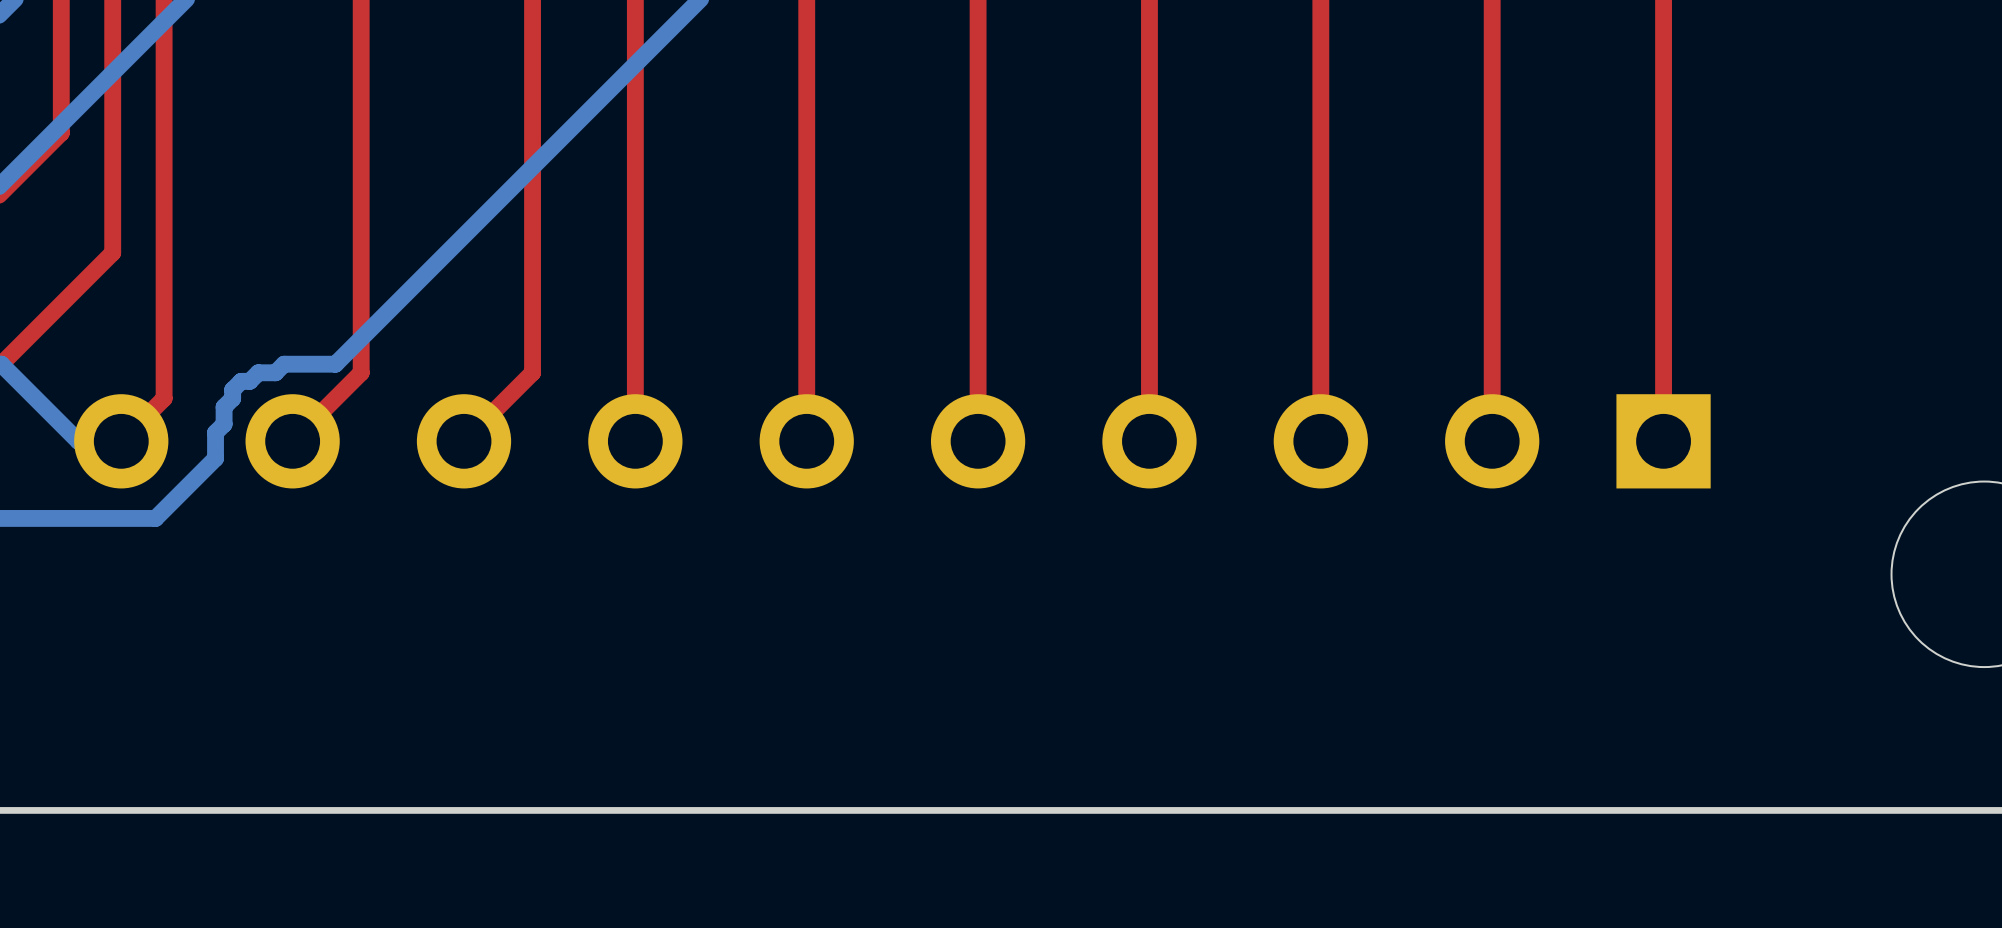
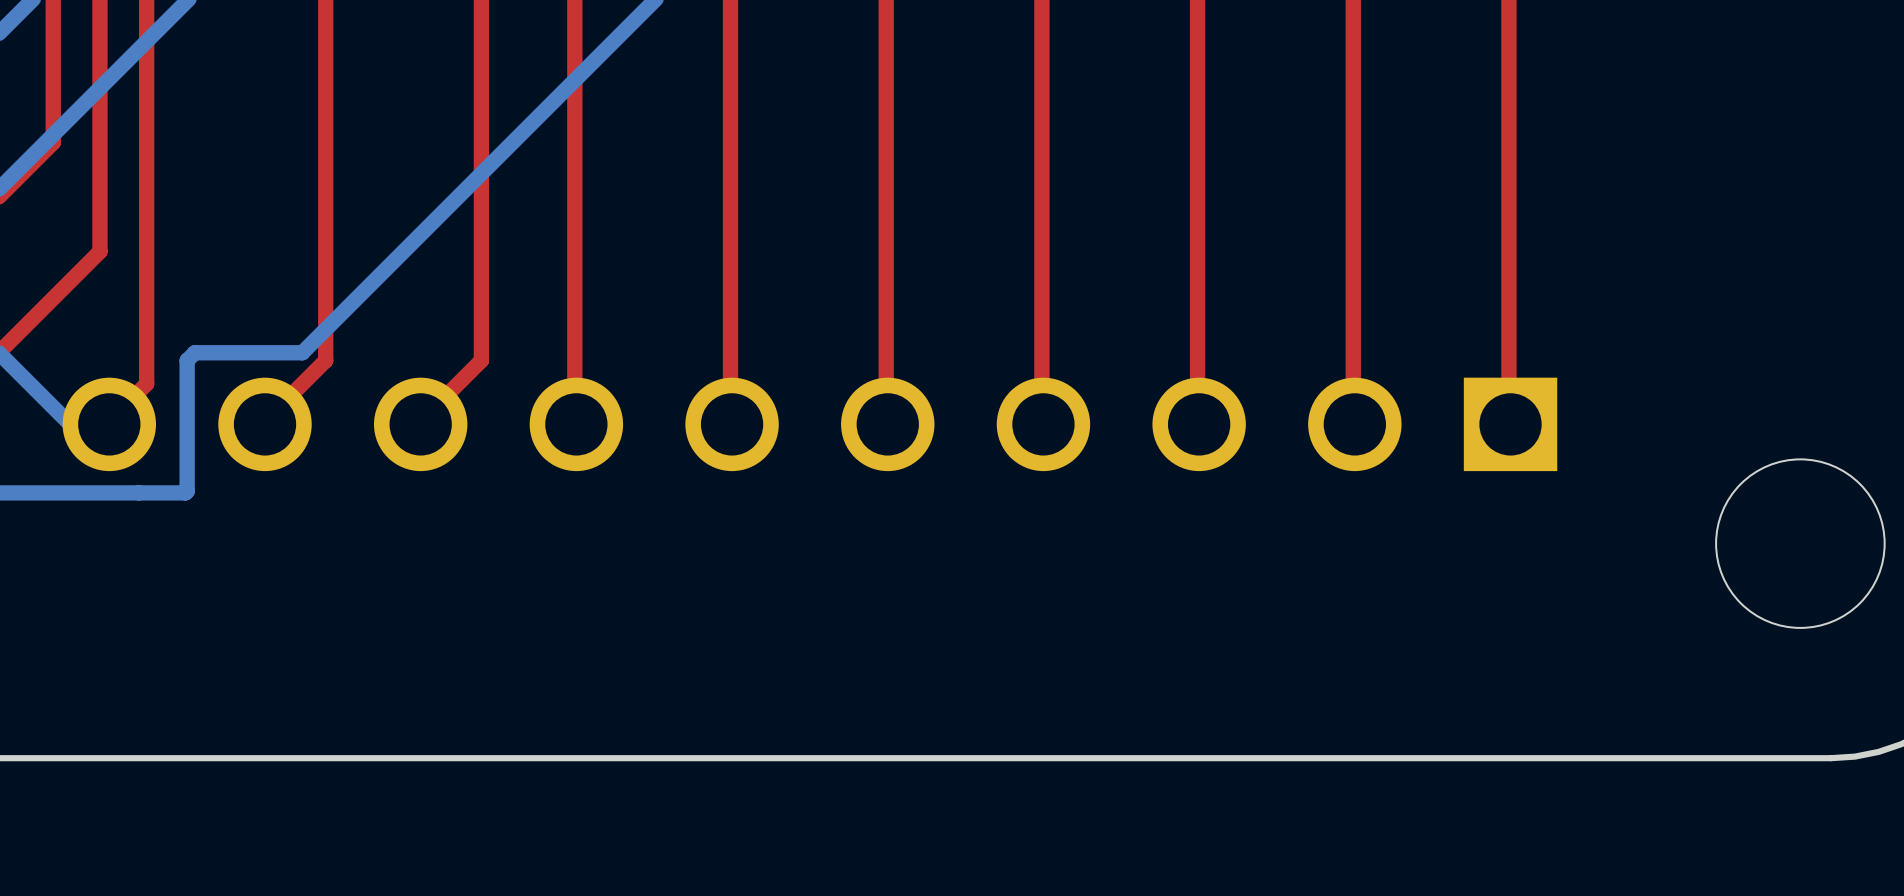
bottom track: (284, 364) (275, 372) (258, 372) (249, 381) (241, 381) (232, 389) (232, 398) (224, 407) (224, 424) (215, 432) (215, 458) (155, 518) -> (255, 352) (194, 352) (187, 360) (187, 491) (185, 492) (138, 492)
part footprint: [74, 394, 1711, 489] -> [62, 377, 1558, 472]

